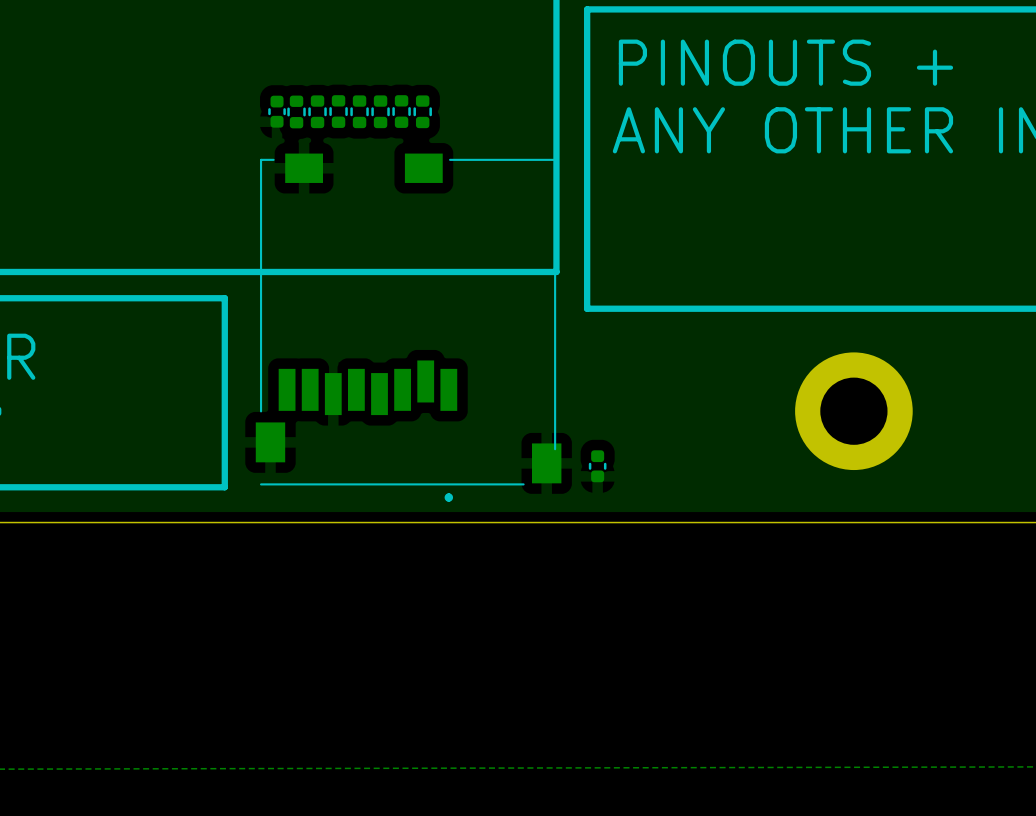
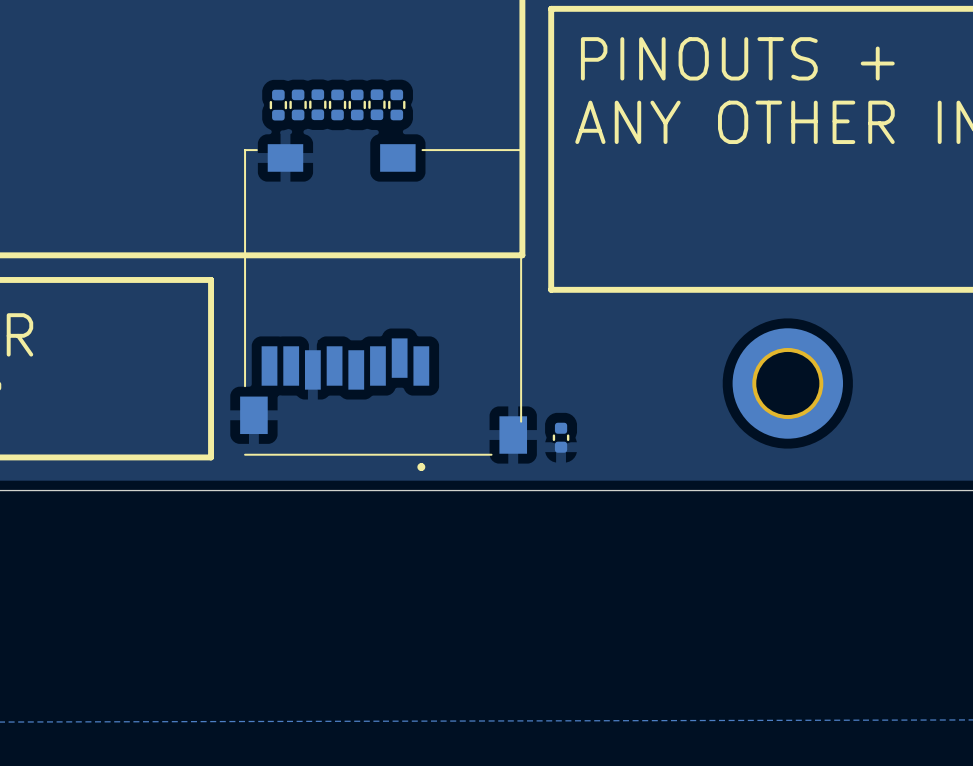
part: (277, 111) -> none
part footprint: [795, 352, 913, 471] -> [732, 328, 844, 439]

